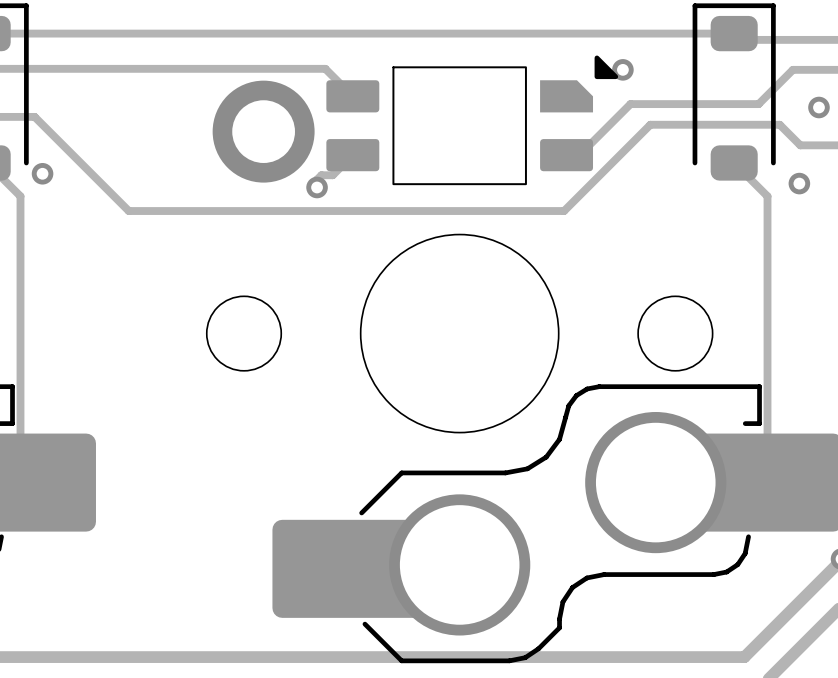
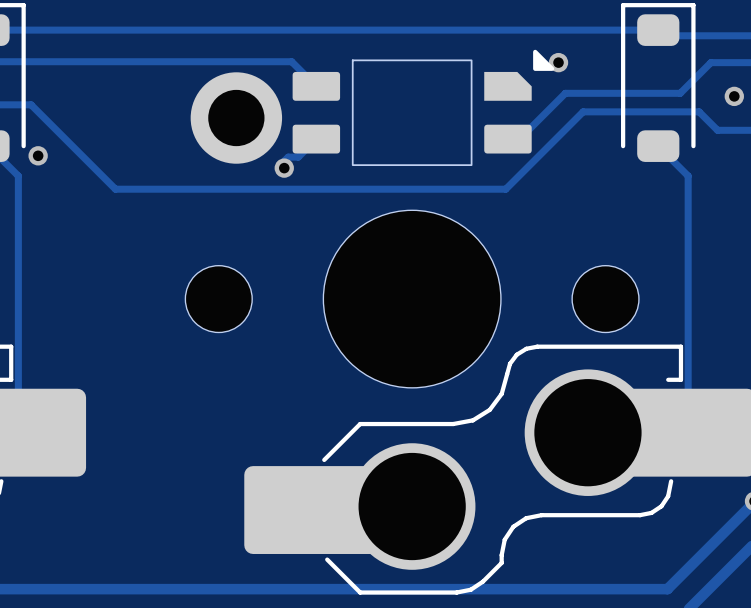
via: (799, 183) -> none

